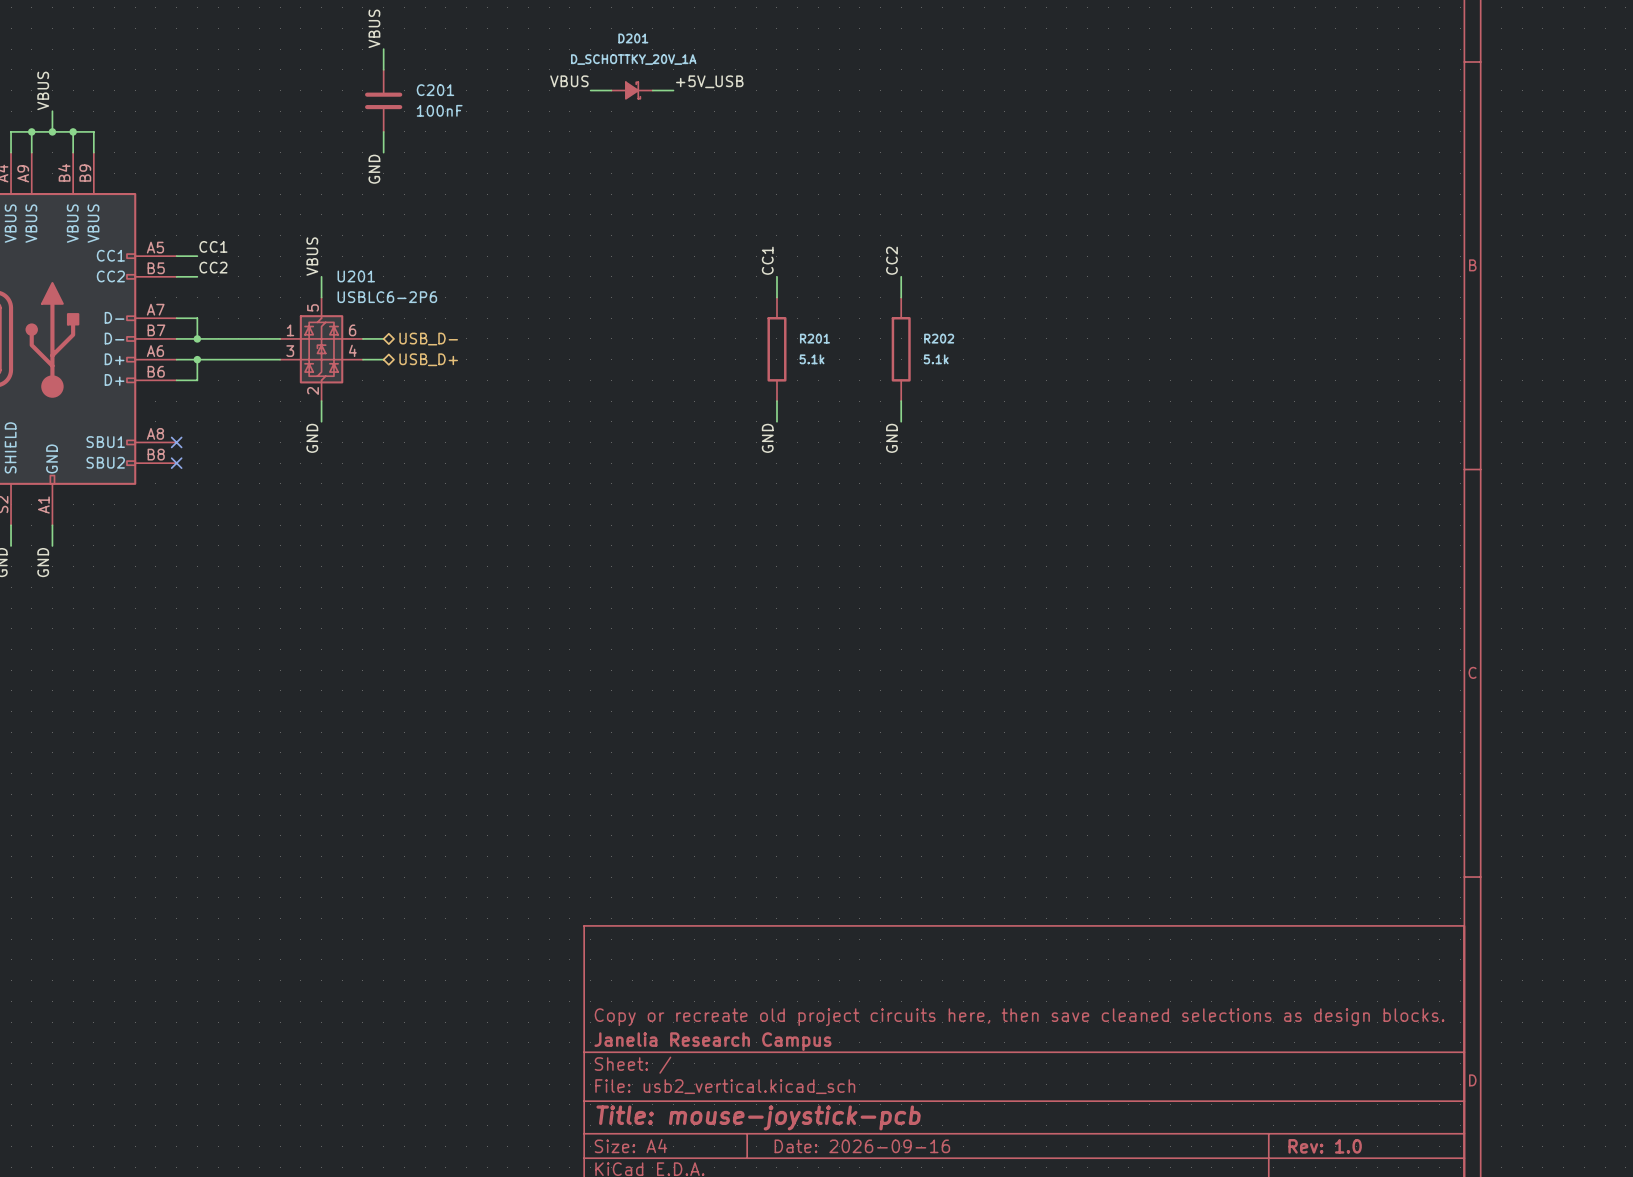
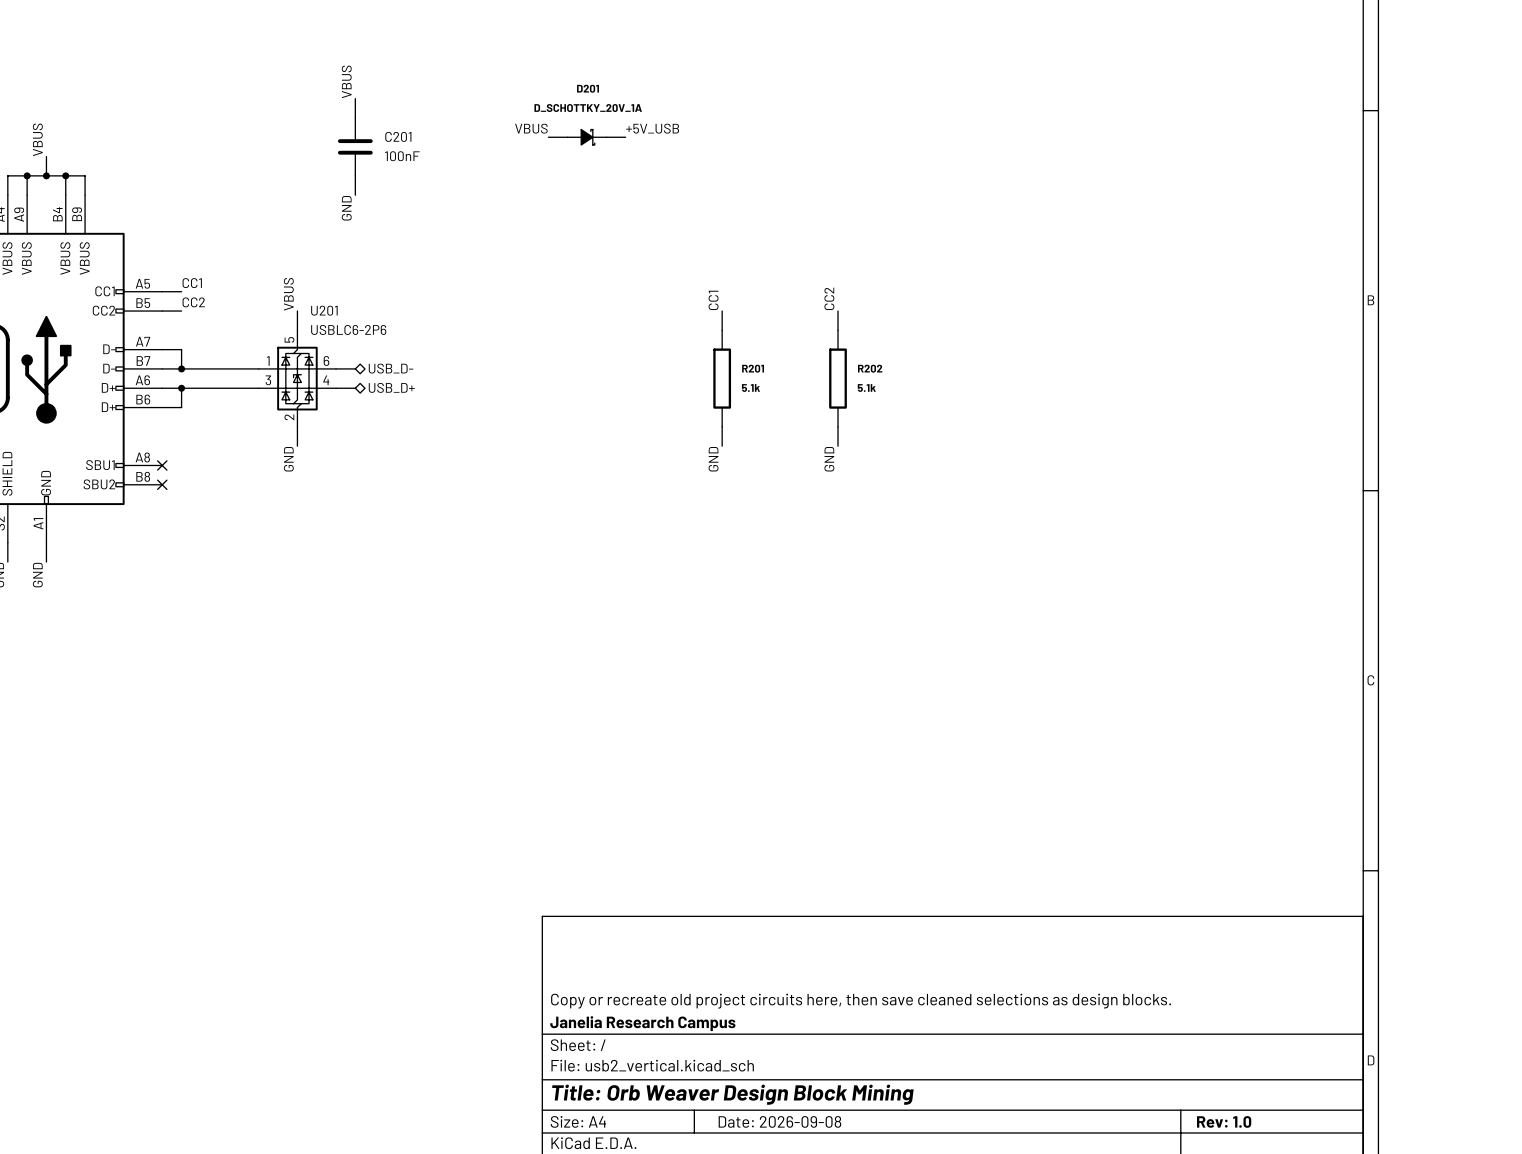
title block: Title: mouse-joystick-pcb (758, 1117) -> Title: Orb Weaver Design Block Mining (732, 1094)
title block: Date: 2026-09-16 (862, 1146) -> Date: 2026-09-08 (779, 1121)

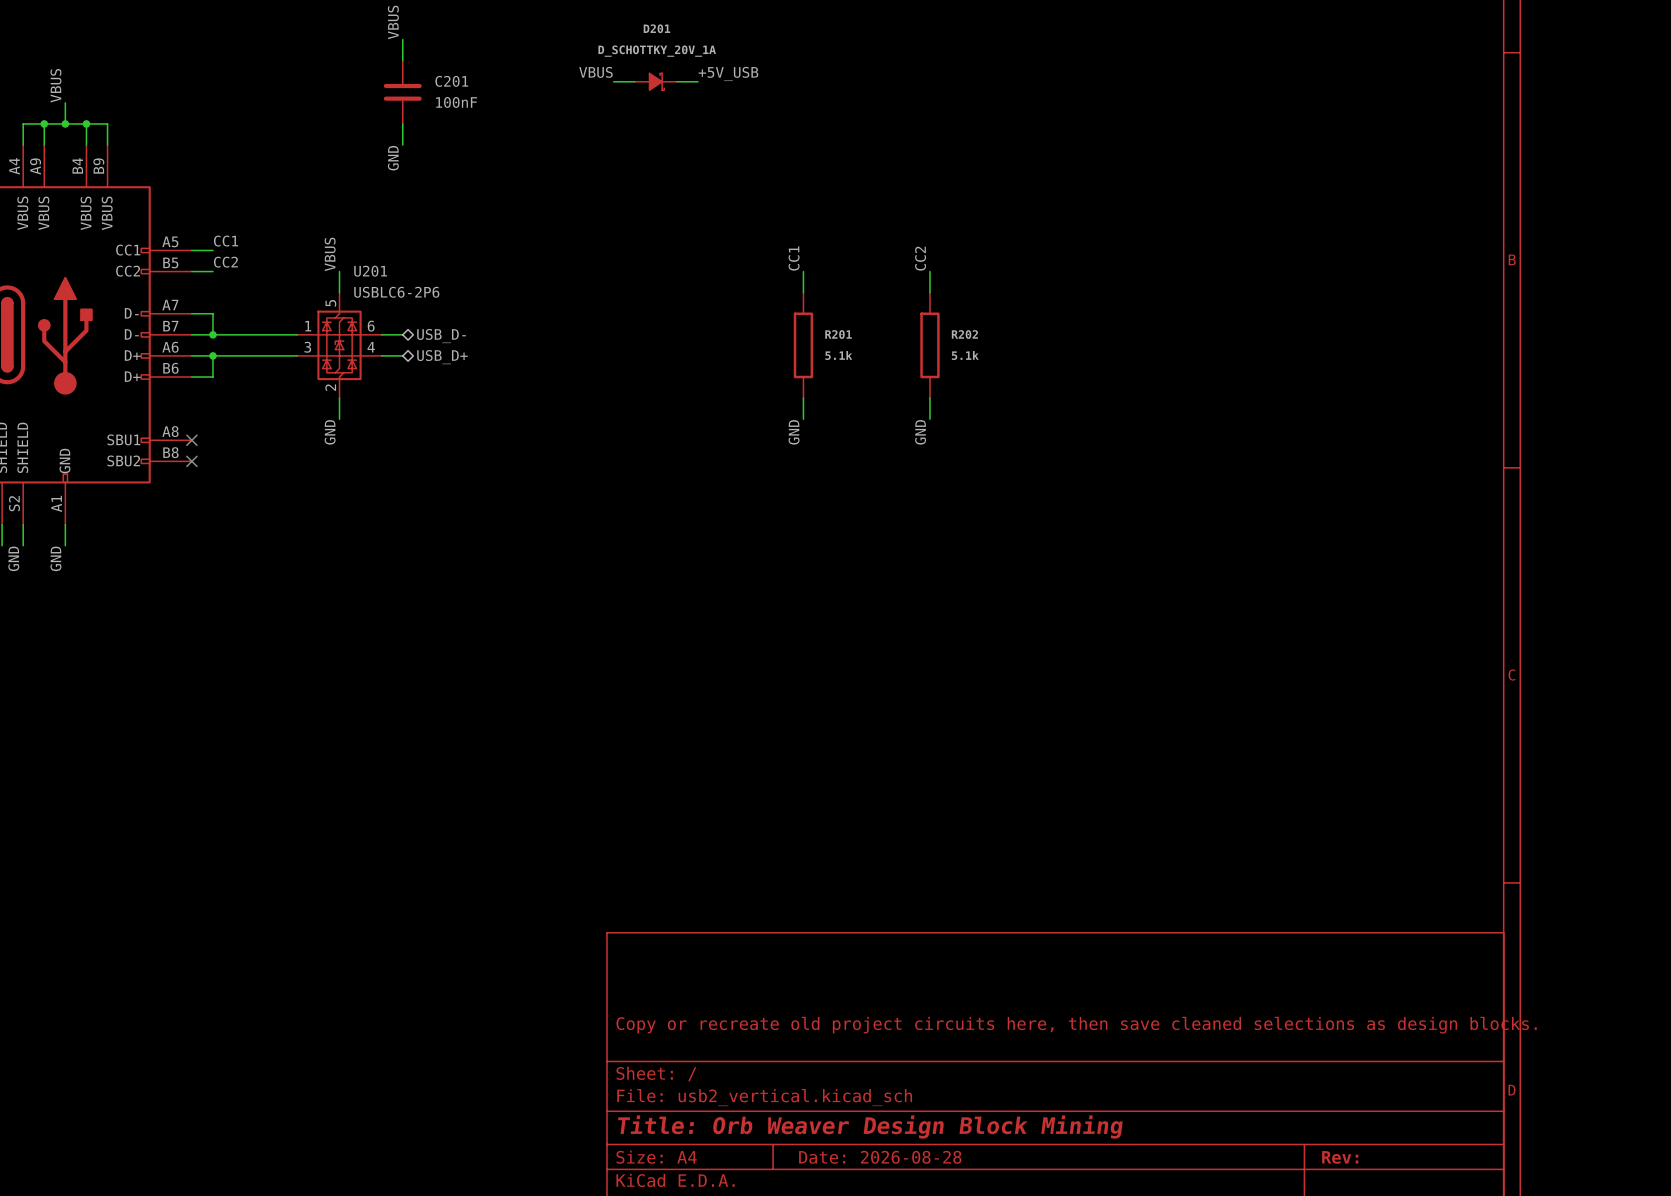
title block: Janelia Research Campus (642, 1023) -> none
title block: Date: 2026-09-08 (779, 1121) -> Date: 2026-08-28 (880, 1157)
title block: Rev: 1.0 (1224, 1121) -> Rev: (1340, 1157)

